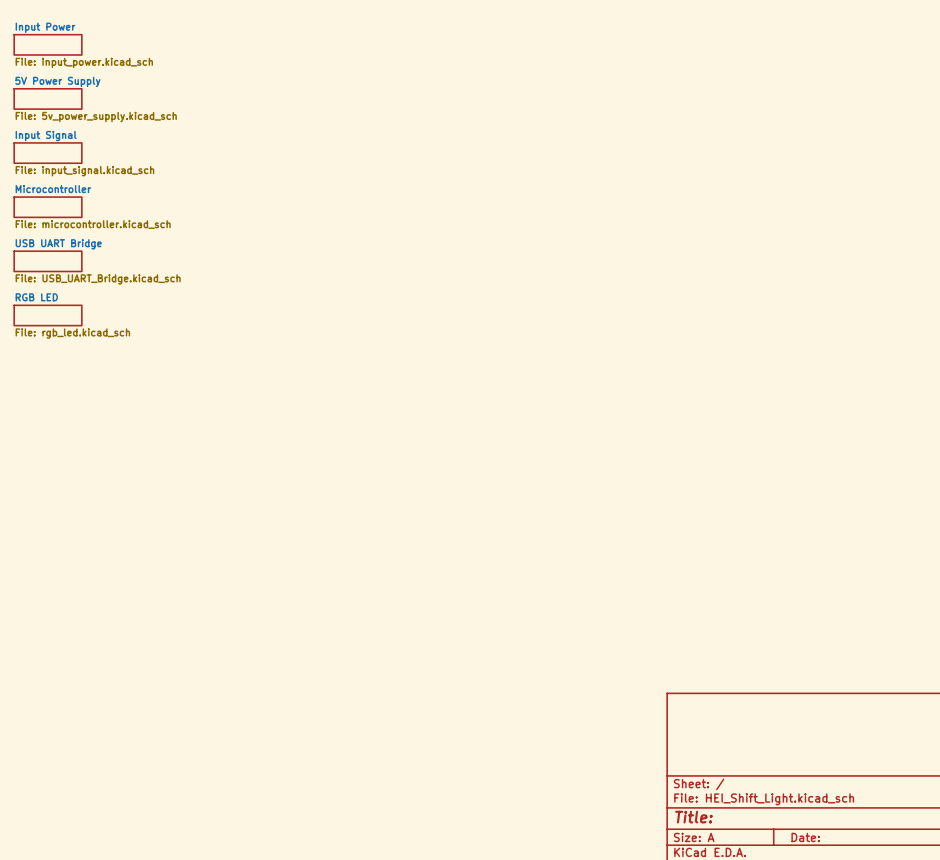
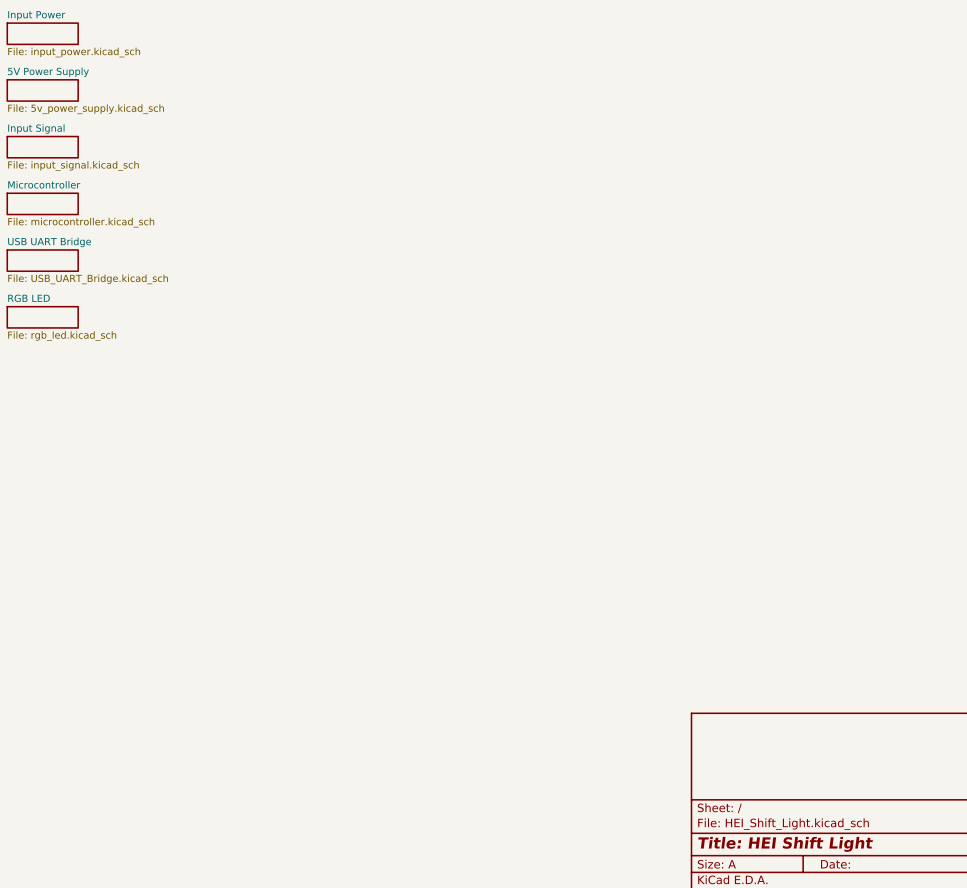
title block: Title: (693, 817) -> Title: HEI Shift Light (785, 844)

